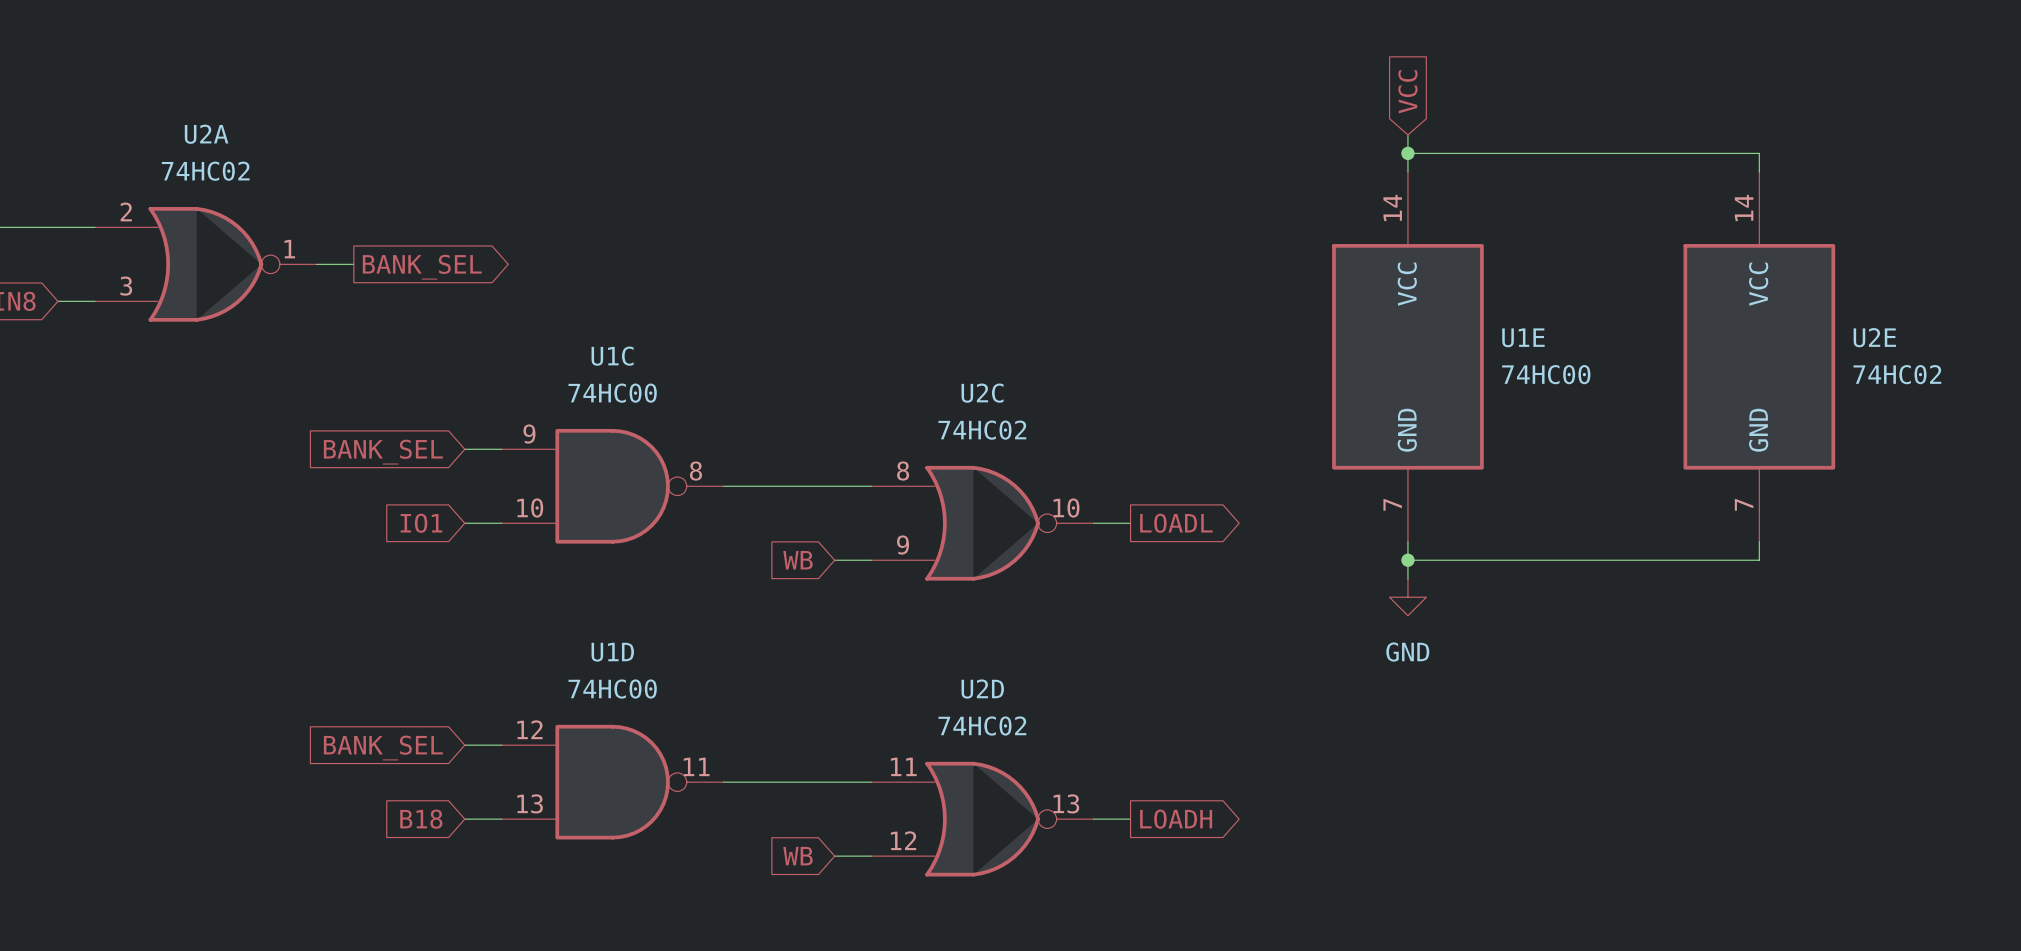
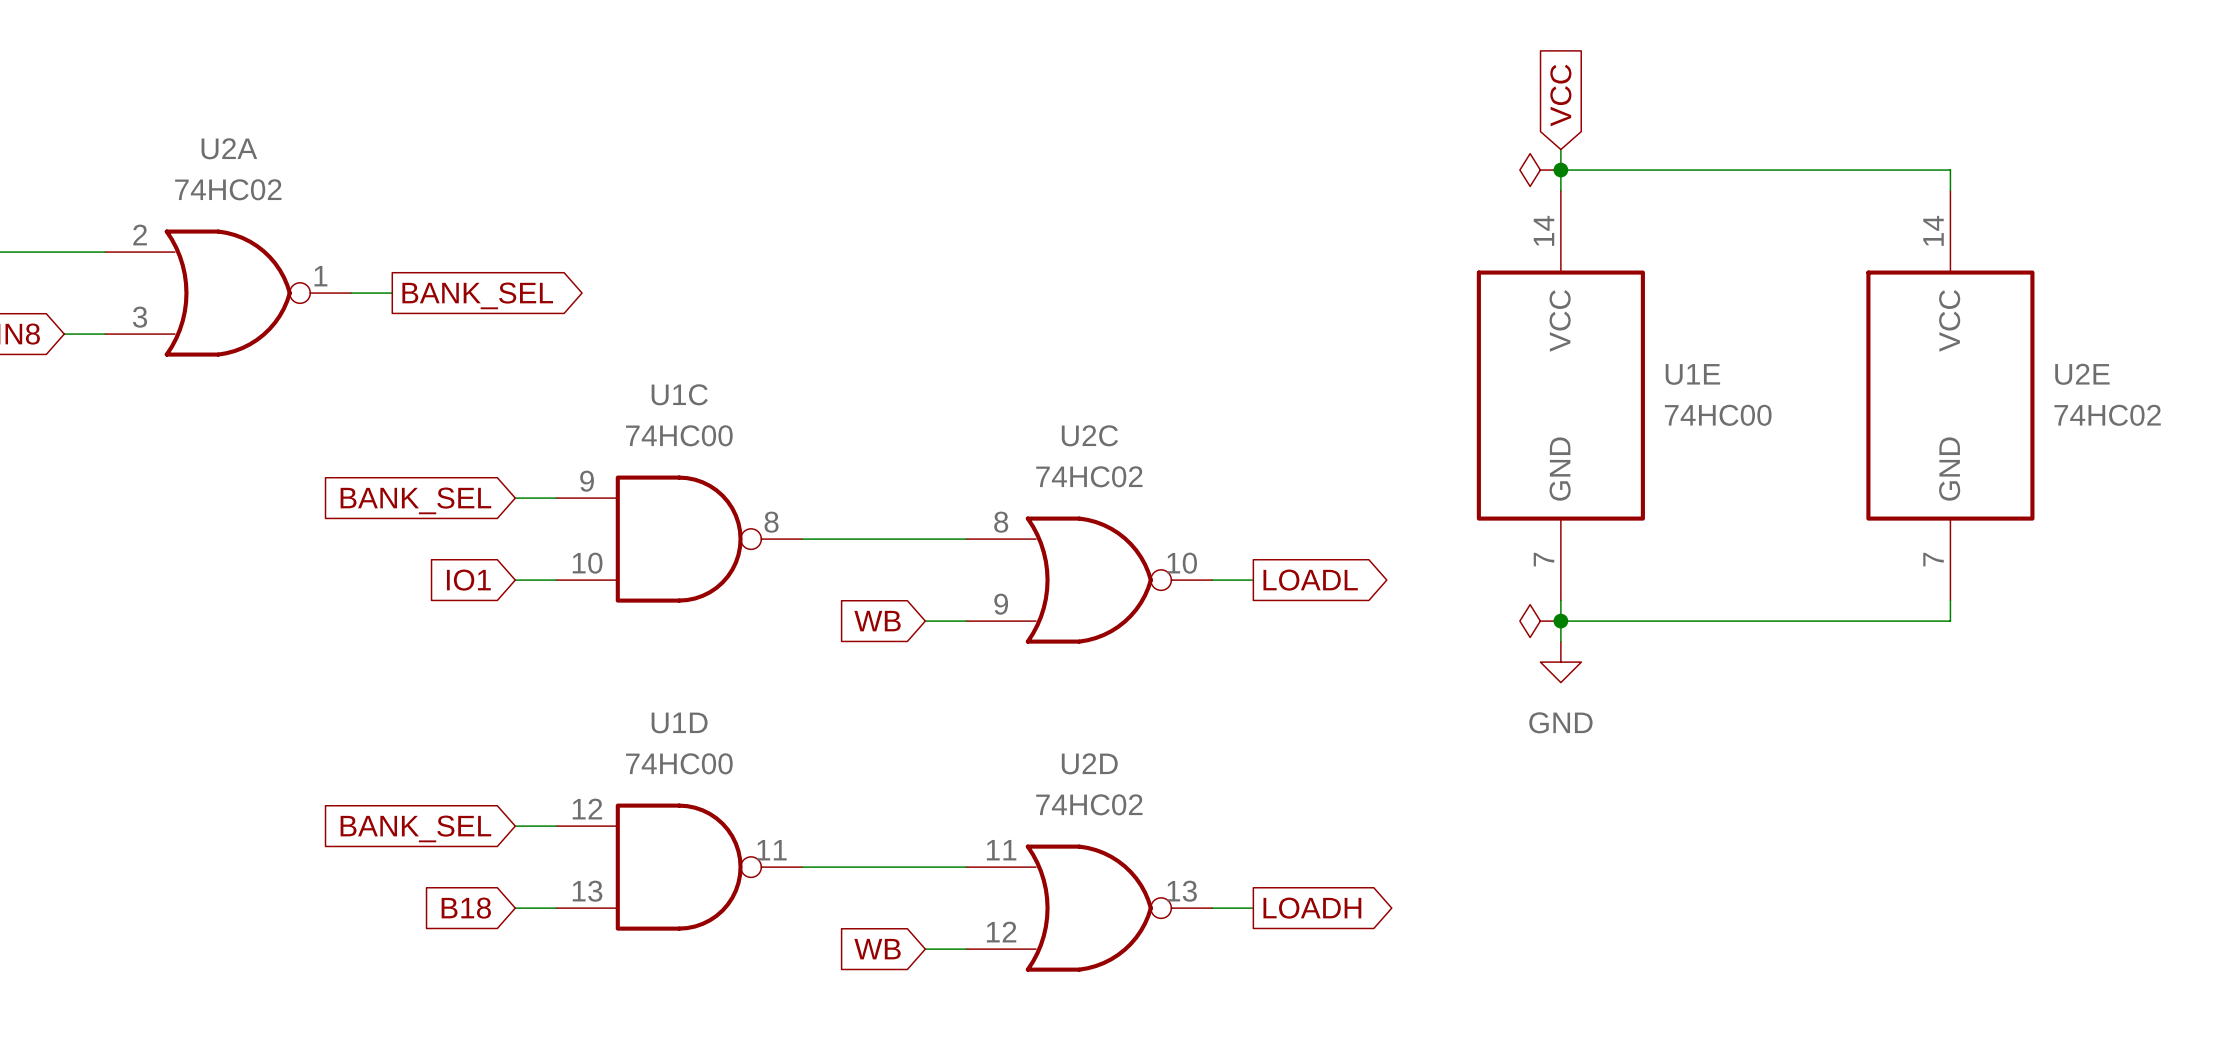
power symbol: none -> (1540, 170)
power symbol: none -> (1540, 621)

